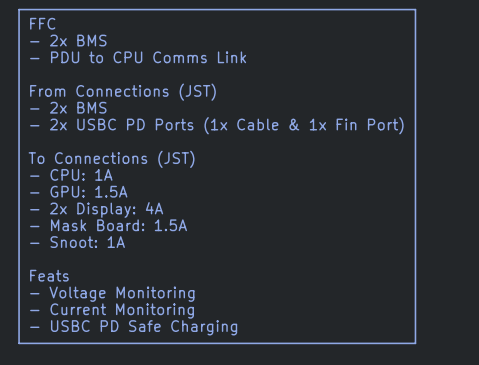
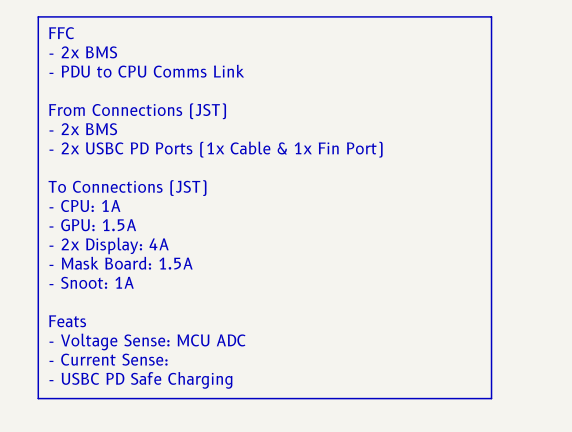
text: - Voltage Monitoring (112, 294) -> - Voltage Sense: MCU ADC (147, 341)
text: - Current Monitoring (112, 310) -> - Current Sense: (108, 359)

